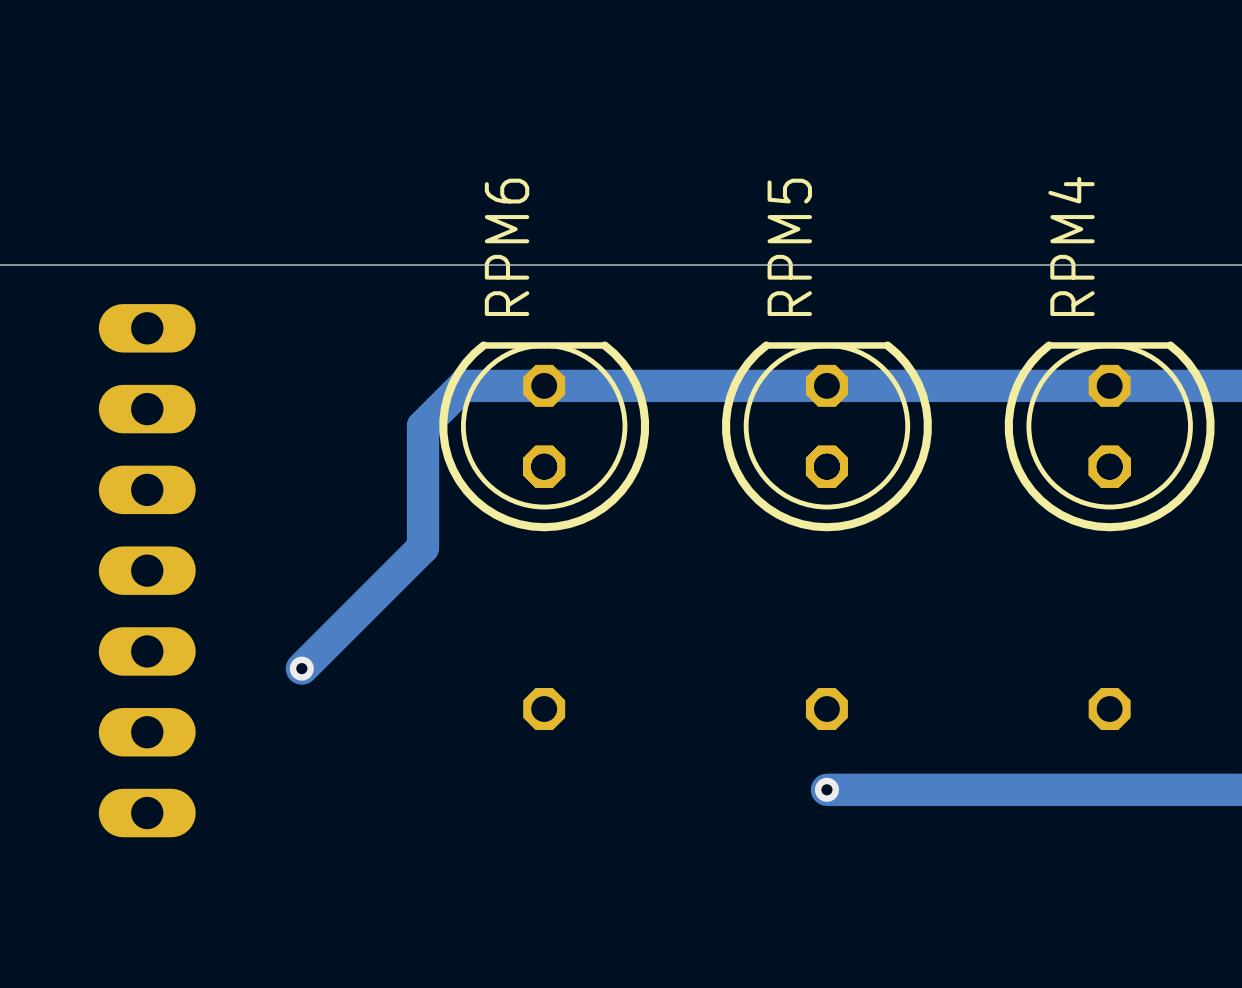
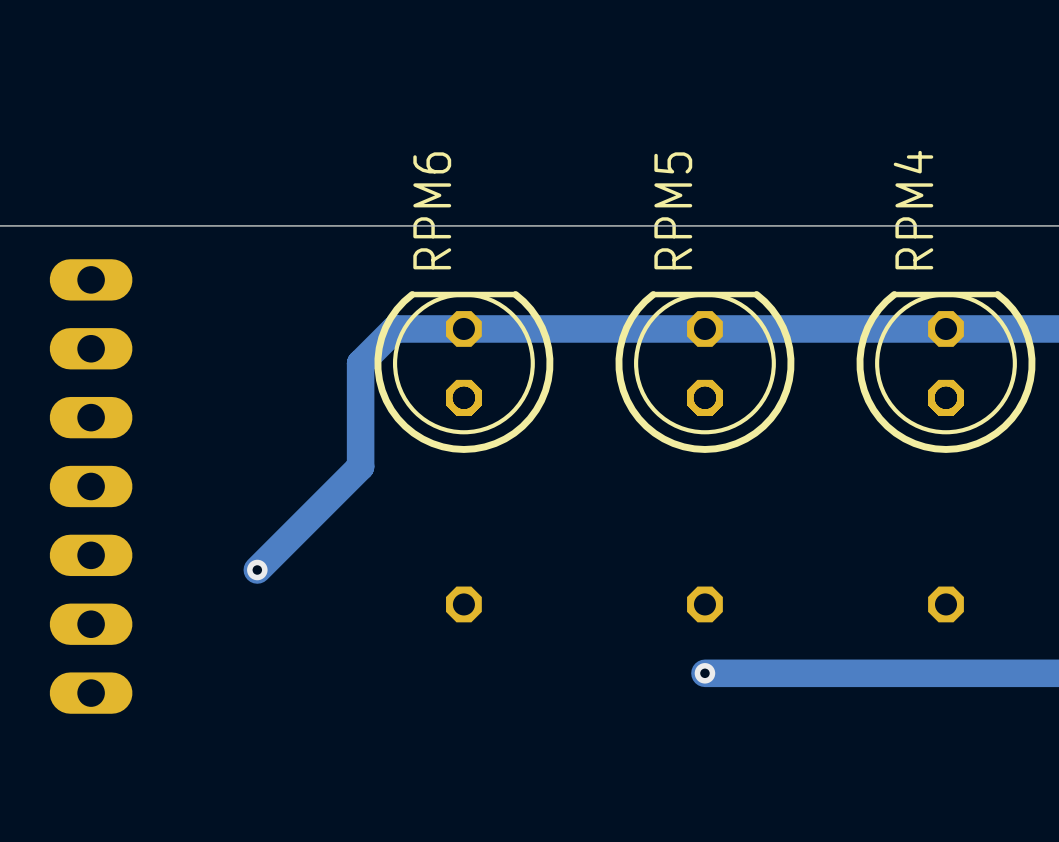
part position: (147, 570) -> (91, 486)

